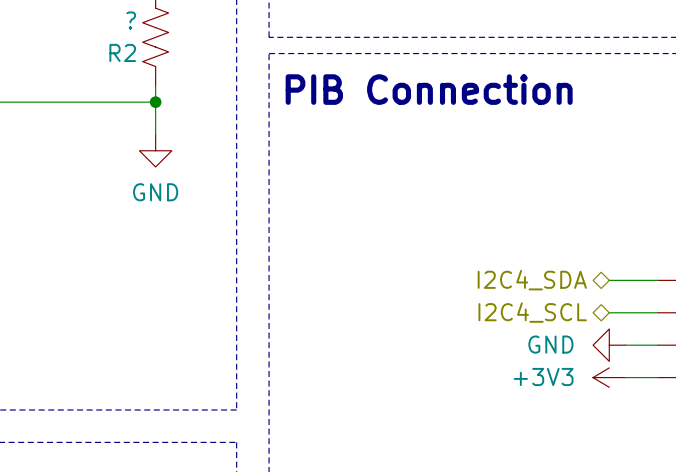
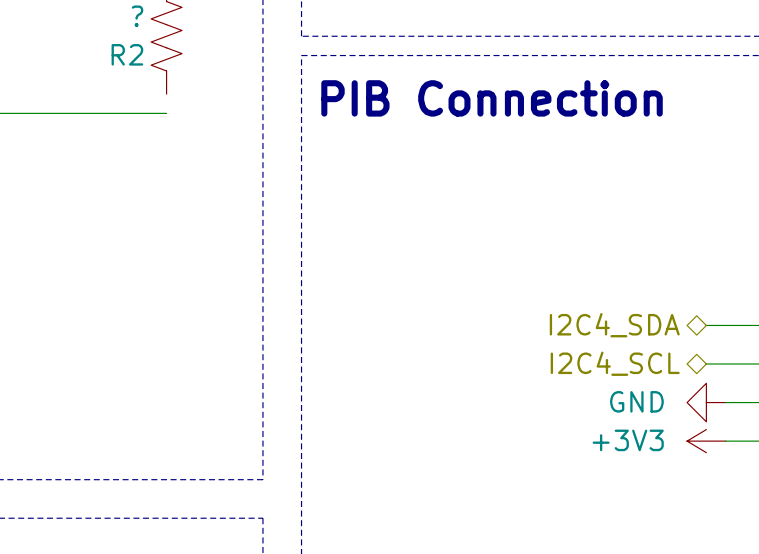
wire: (155, 85) (155, 134) -> none
junction: (155, 102) -> none
power symbol: GND (155, 150) -> none

